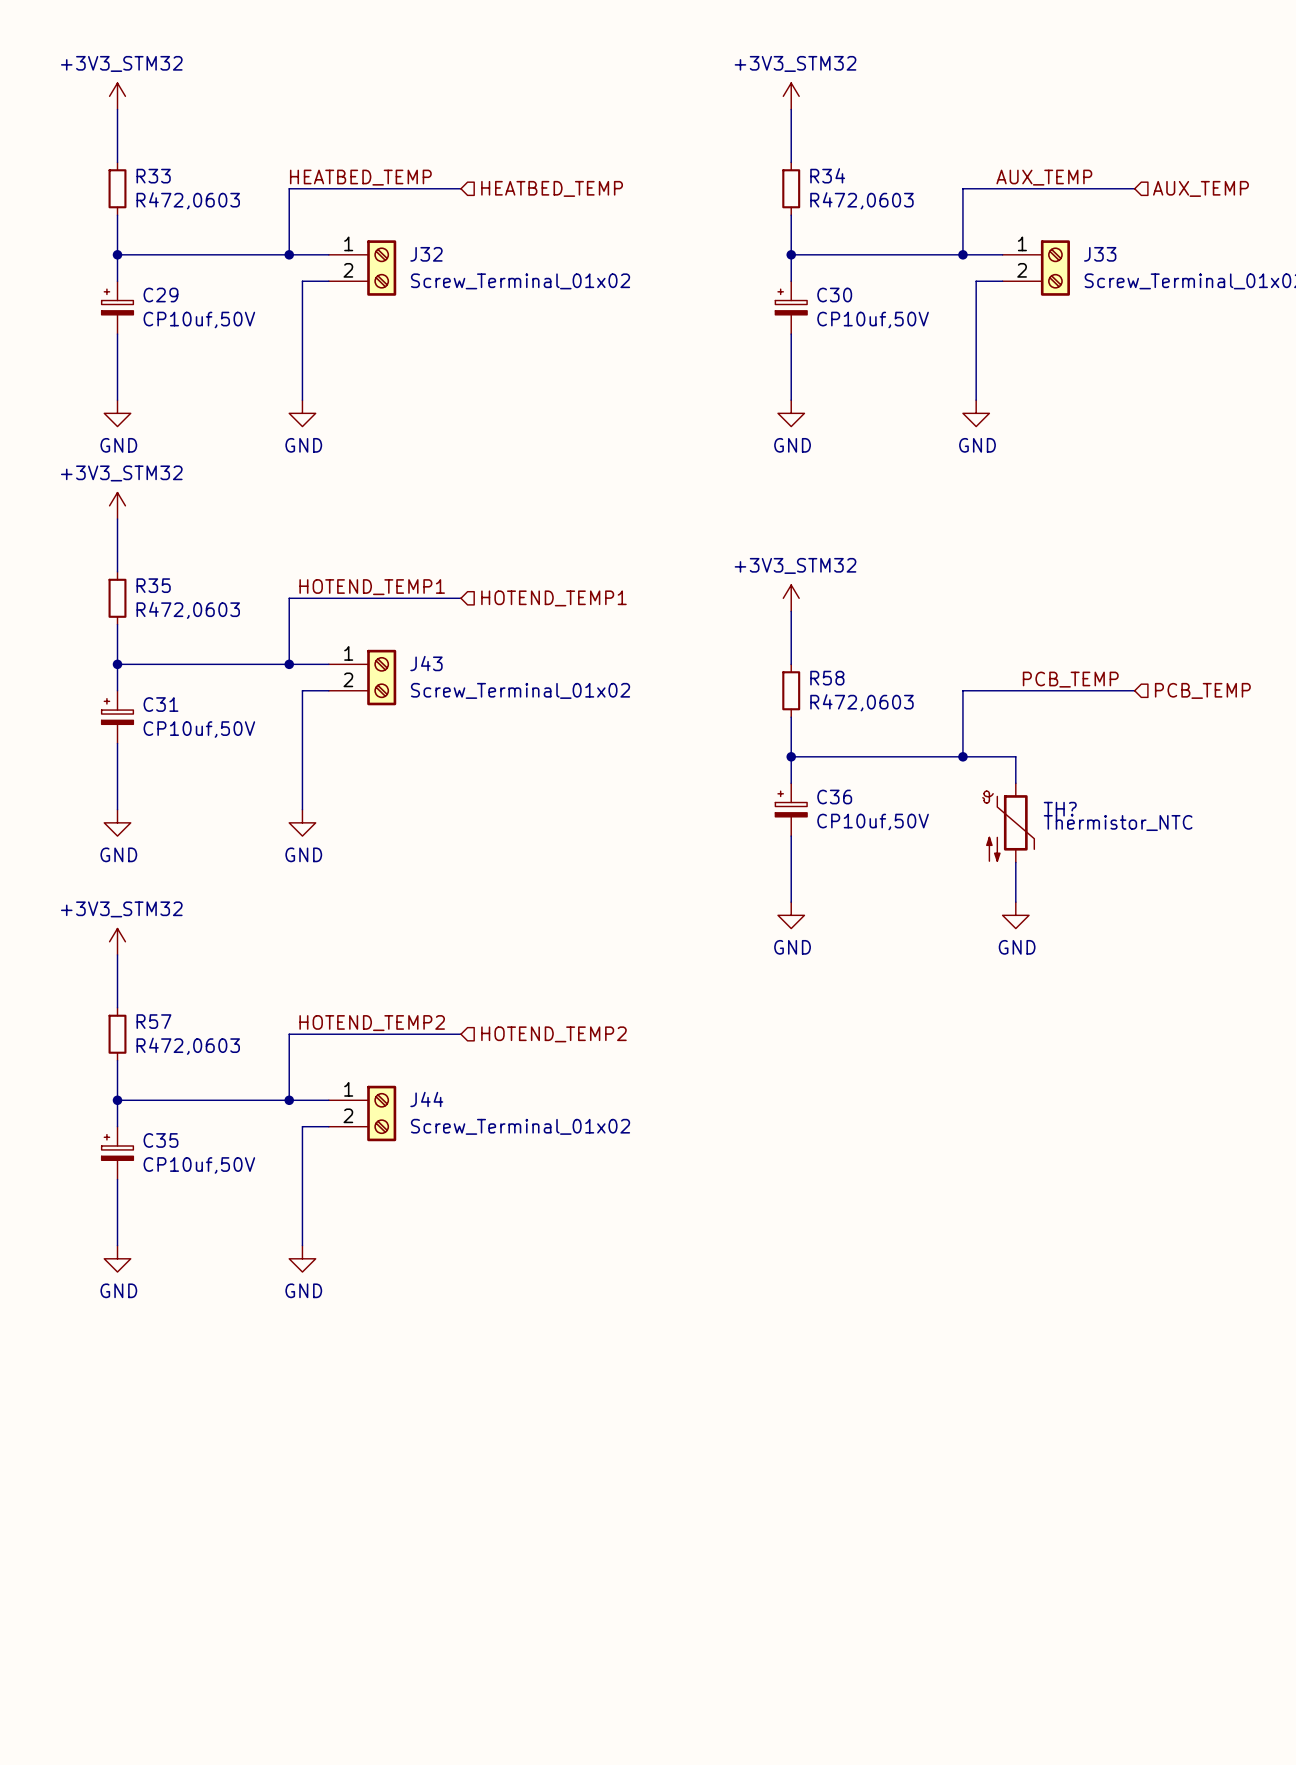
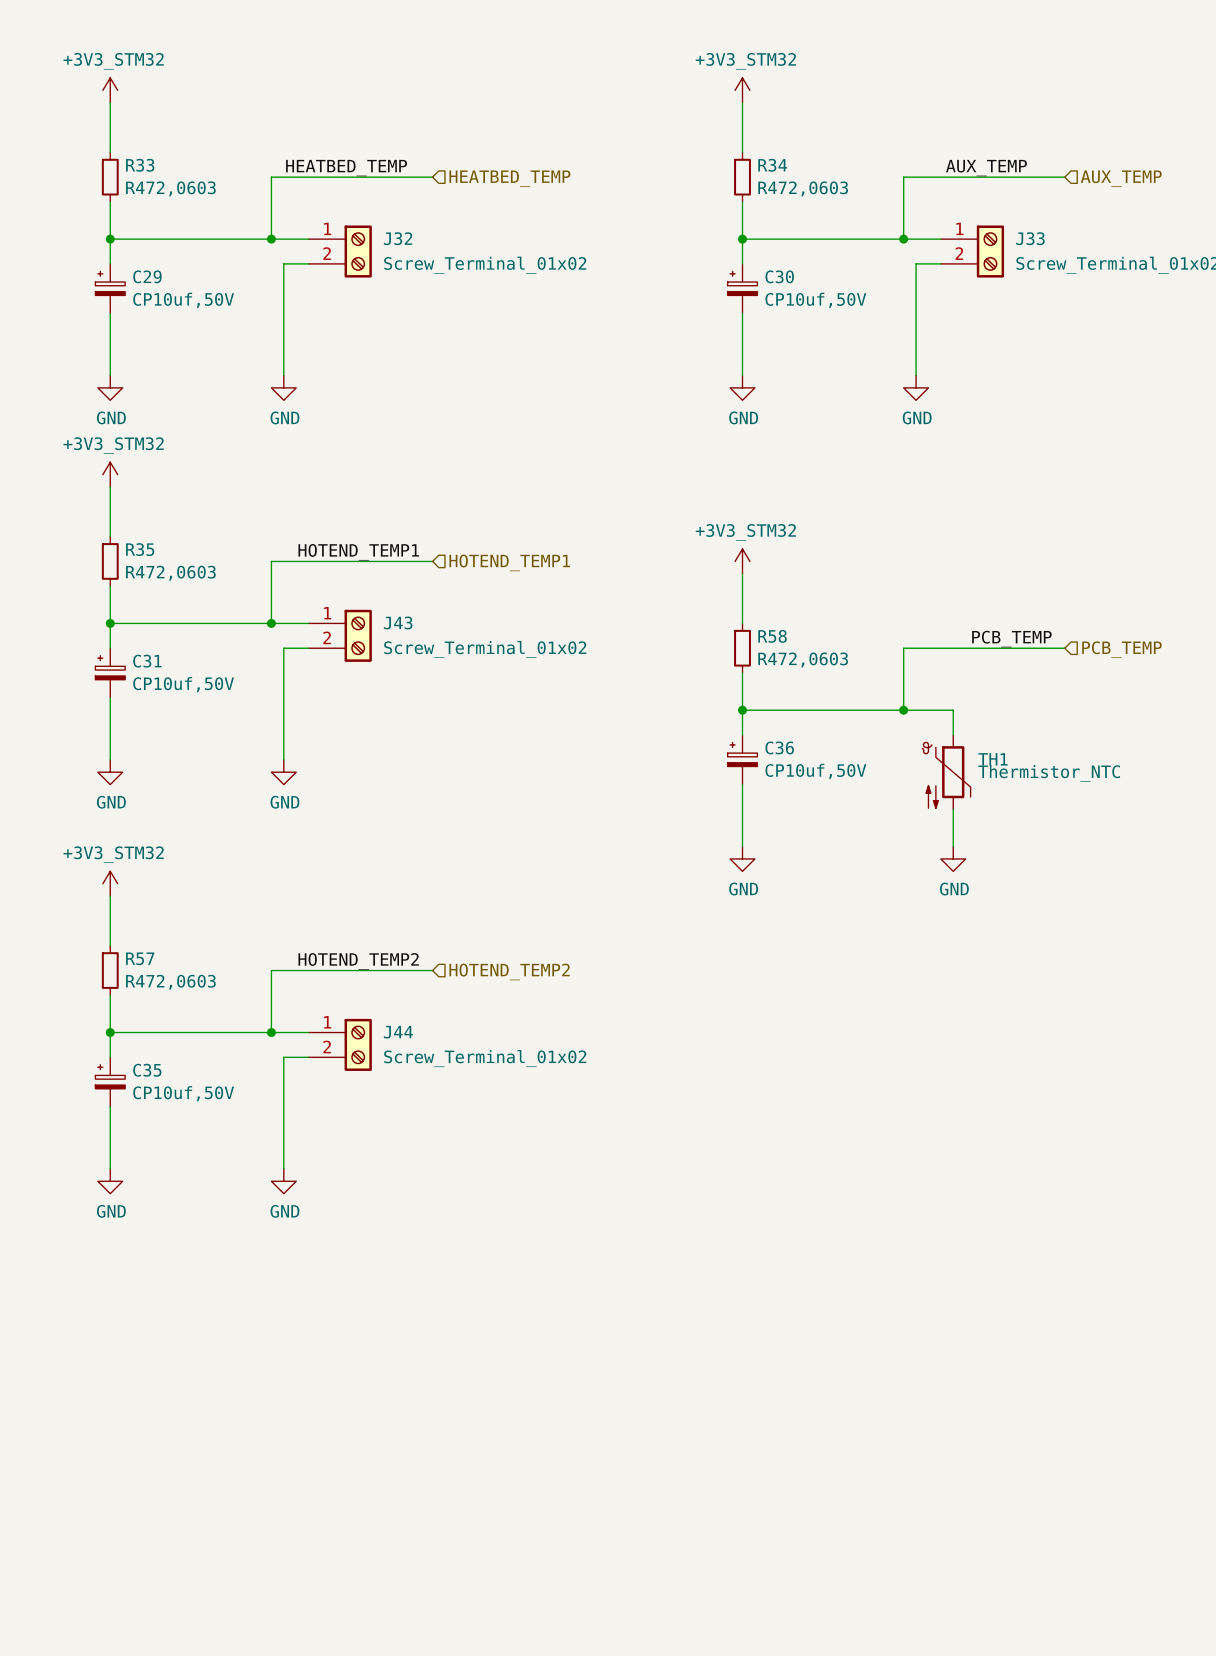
TH? name: TH? (1060, 809) -> TH1 (993, 759)

